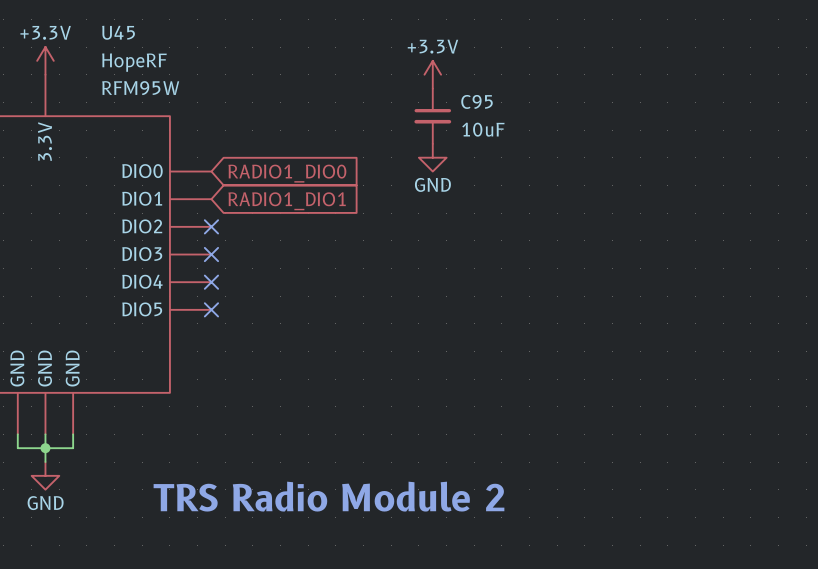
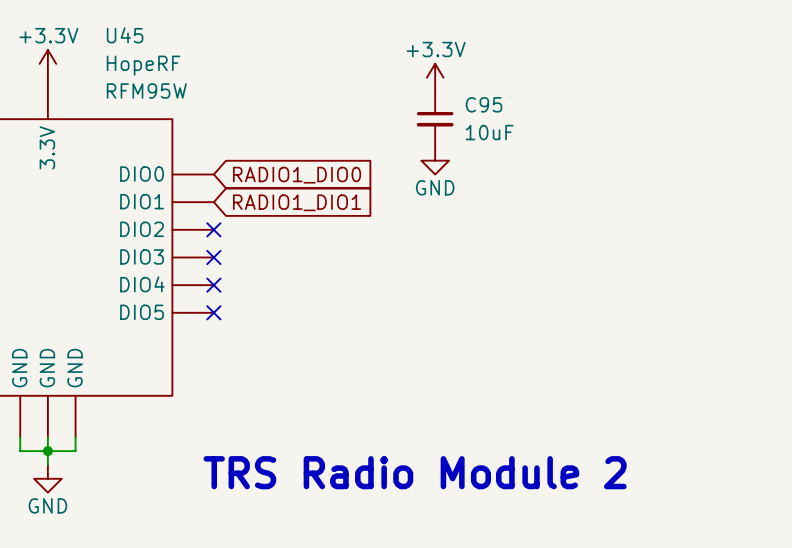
text position: TRS Radio Module 2 (328, 496) -> TRS Radio Module 2 (415, 472)

